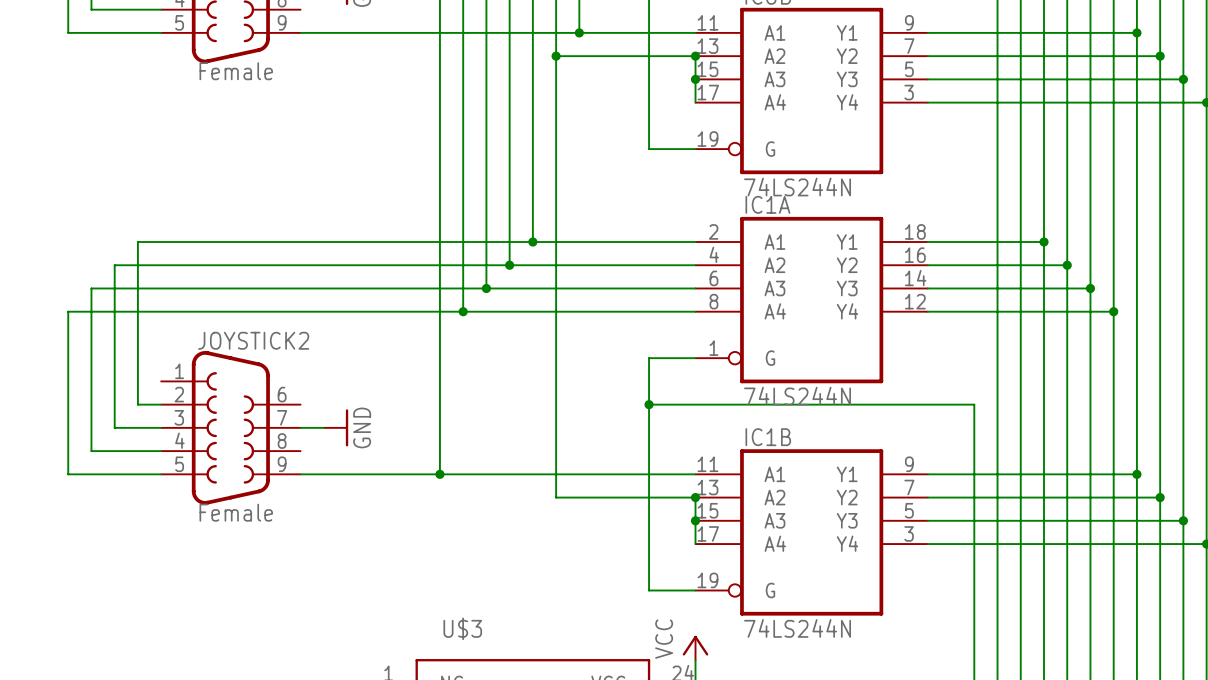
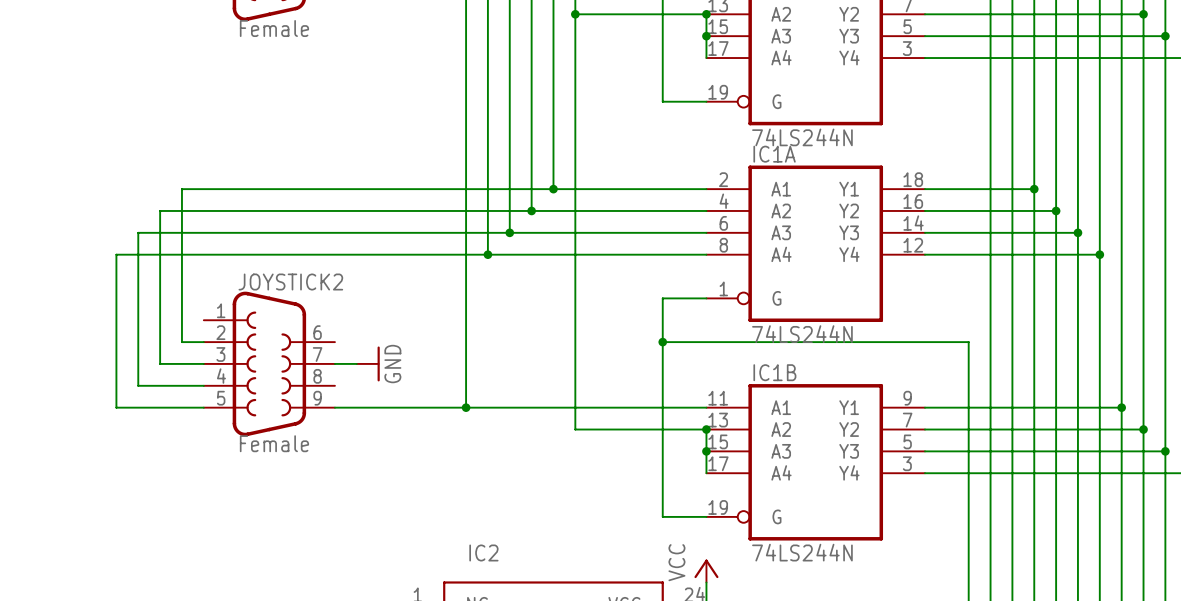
U$3 name: U$3 (462, 628) -> IC2 (483, 552)

